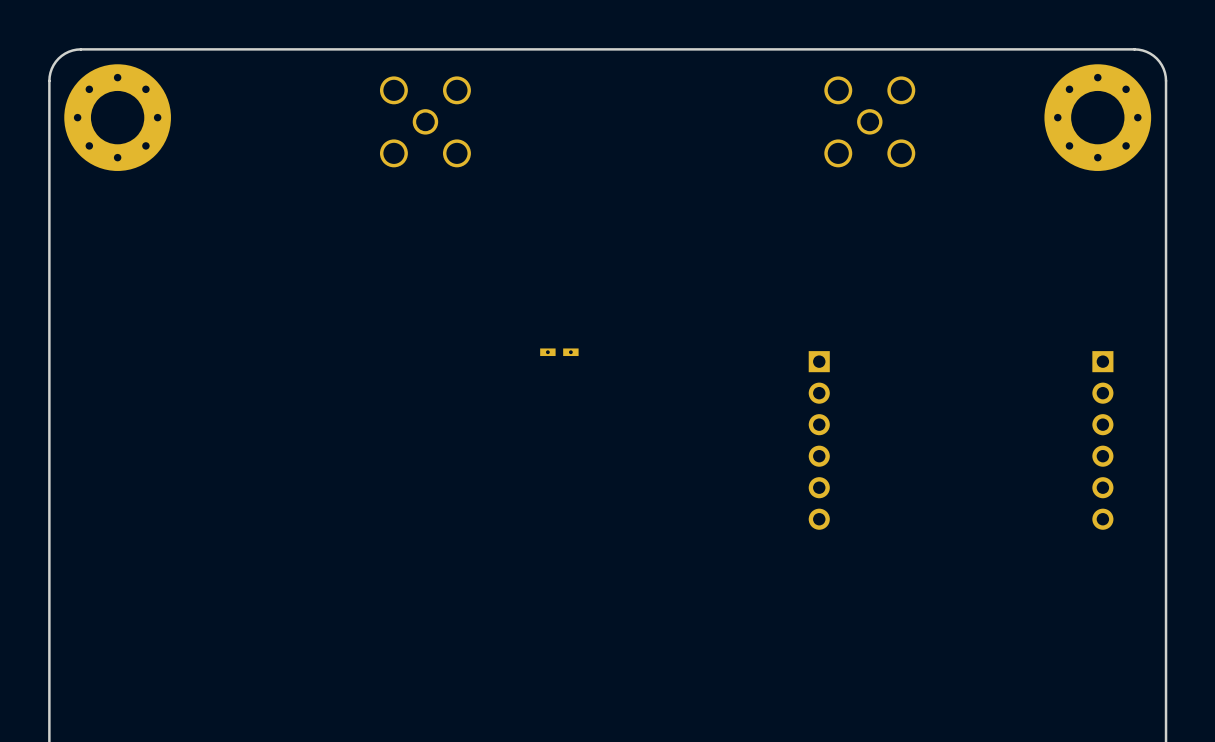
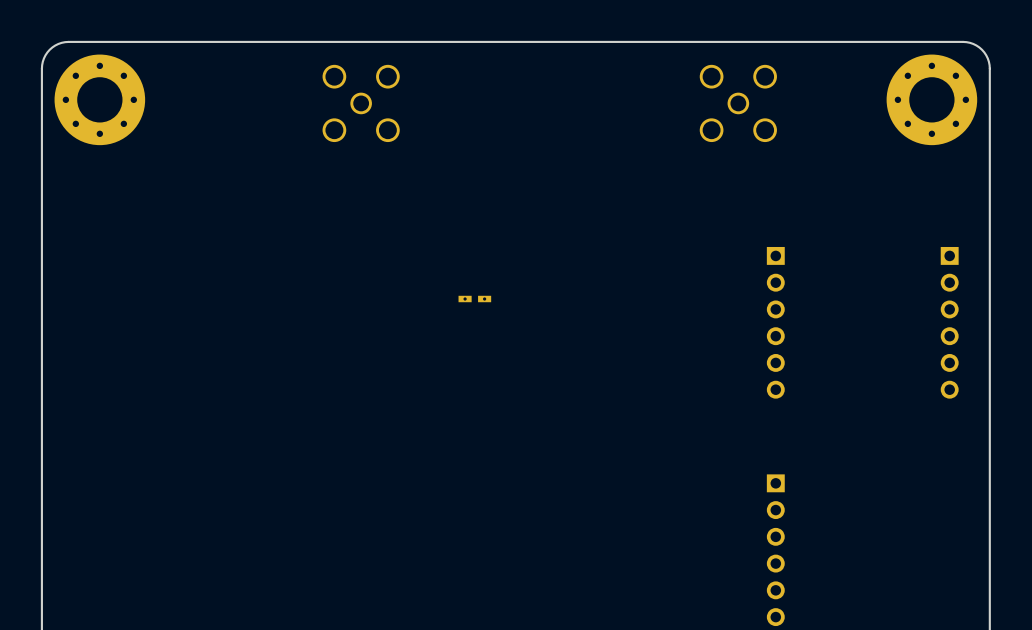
part: none -> (775, 322)
part: (819, 440) -> none
part position: (1102, 440) -> (949, 322)
part: none -> (775, 550)

